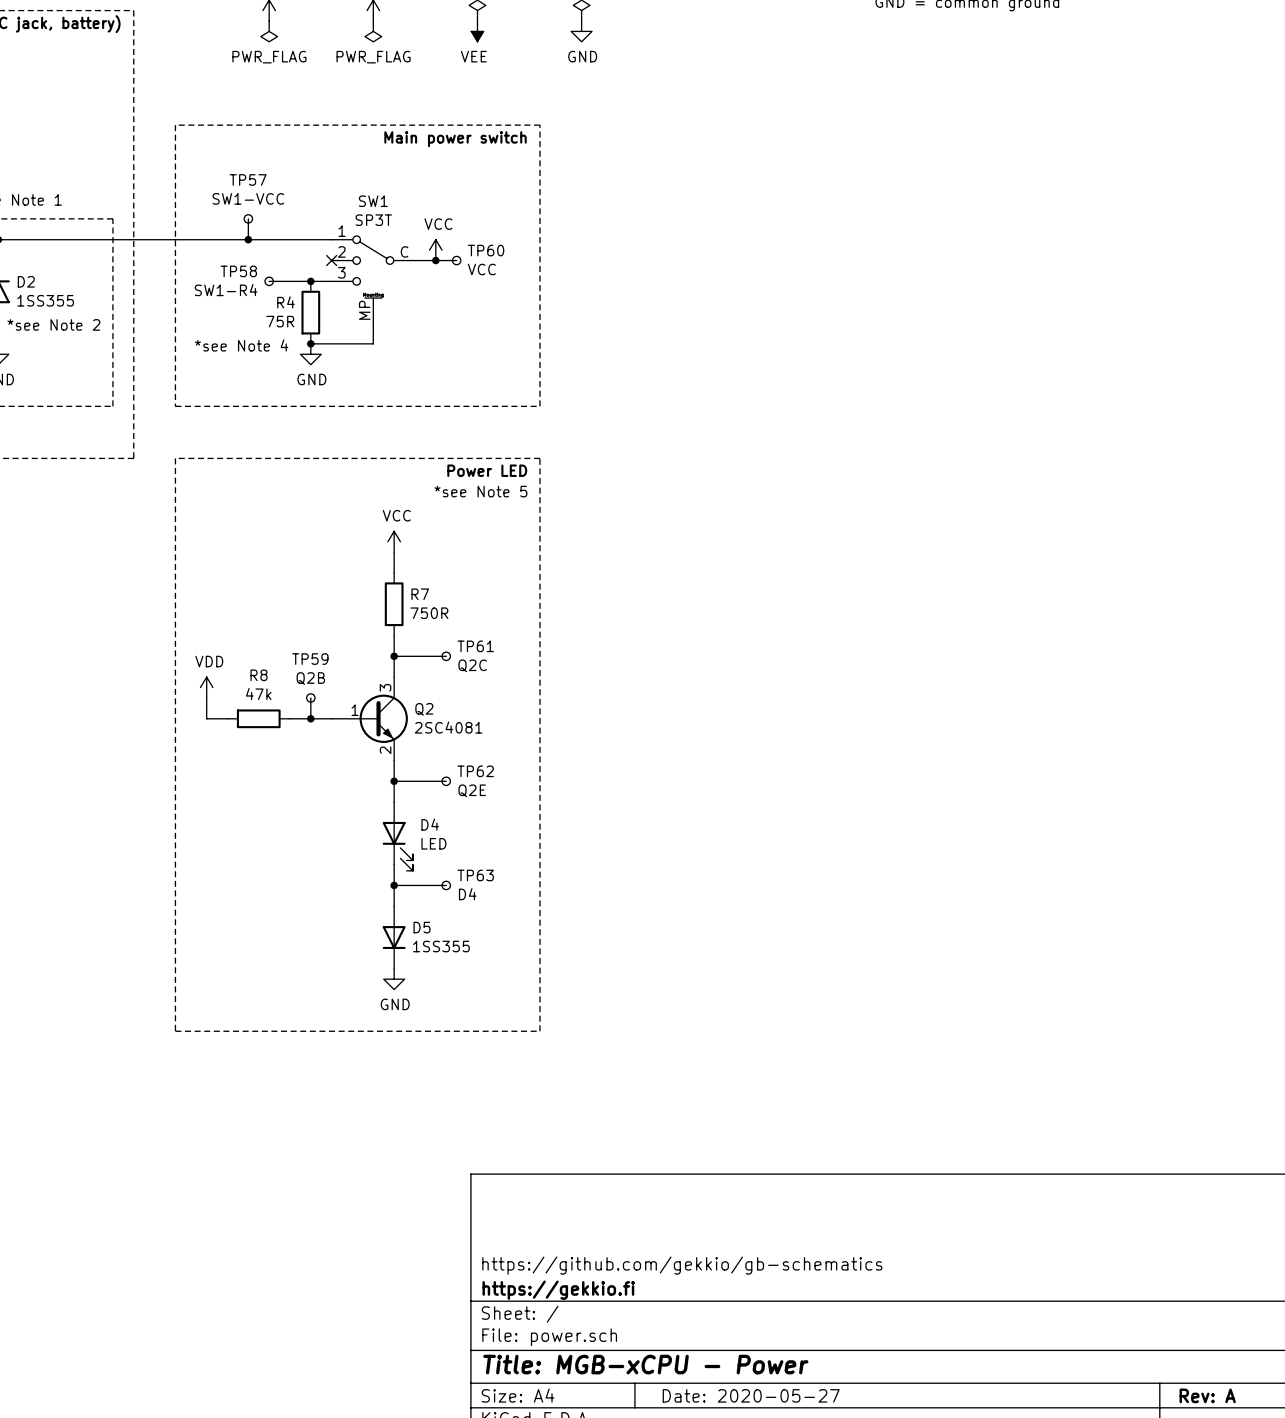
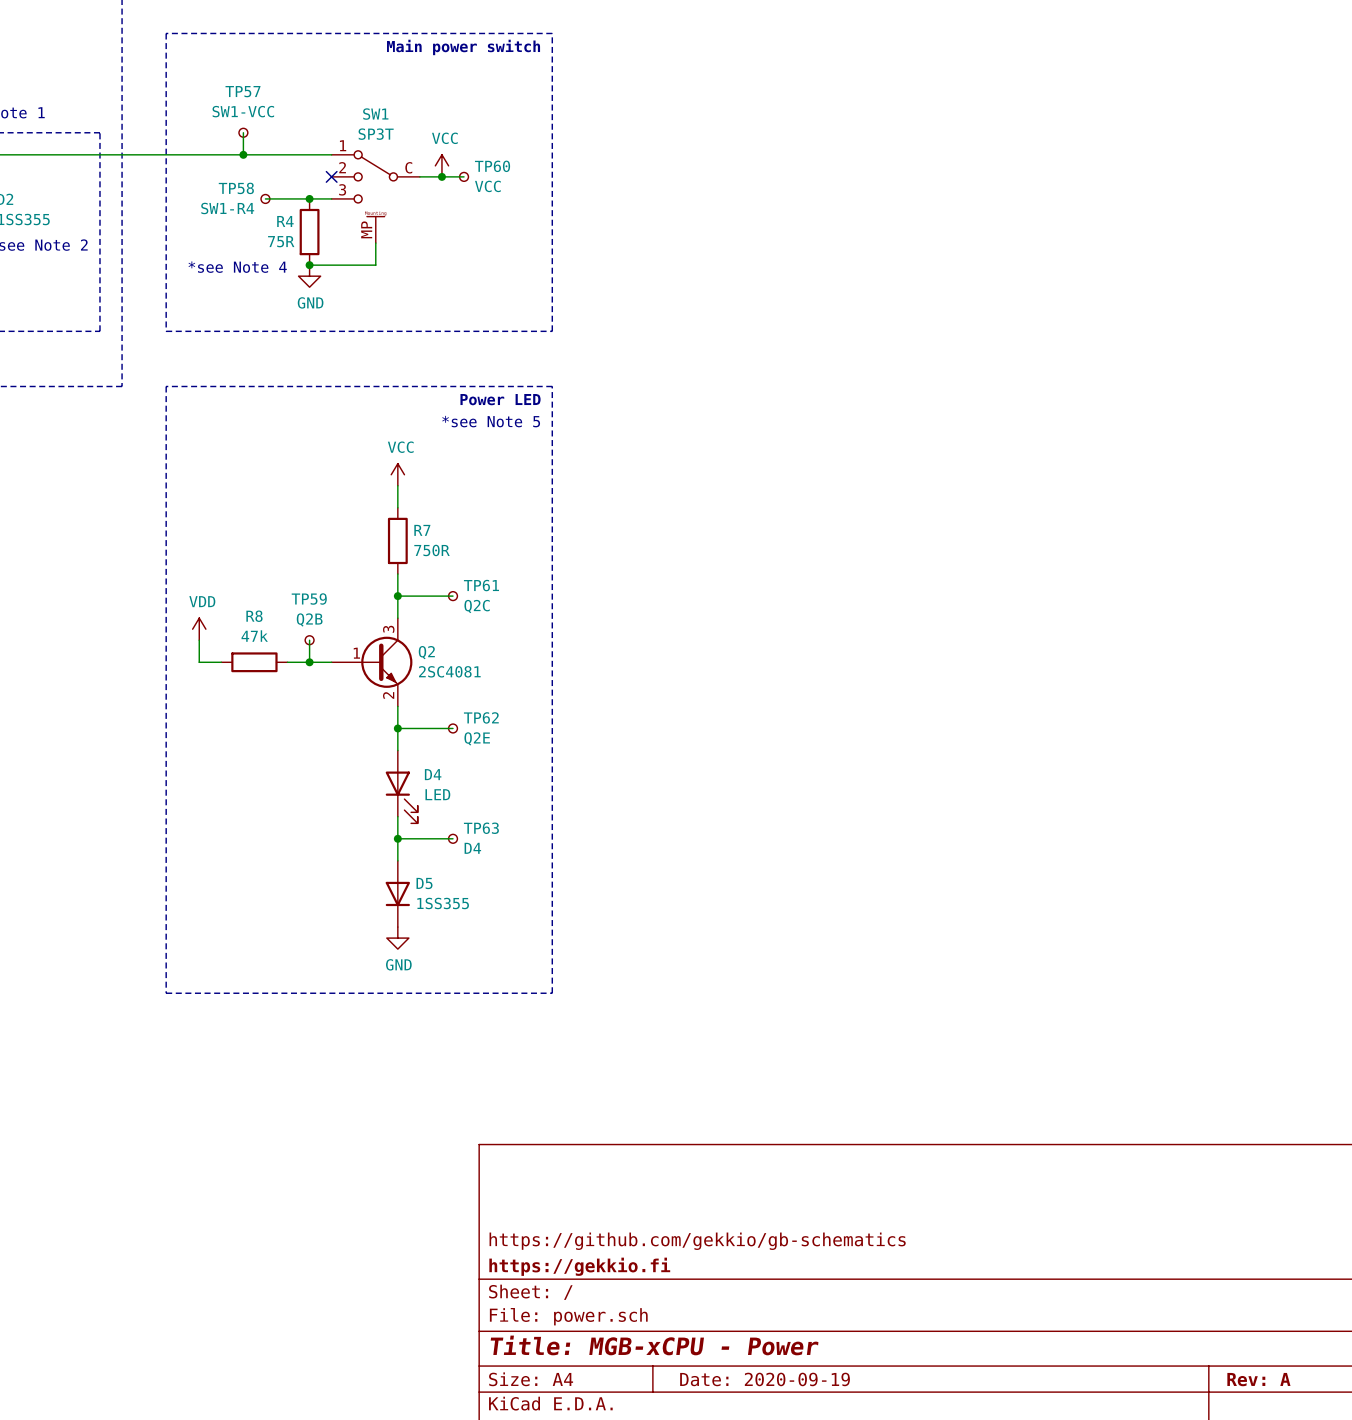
title block: Date: 2020-05-27 (751, 1395) -> Date: 2020-09-19 (765, 1379)

